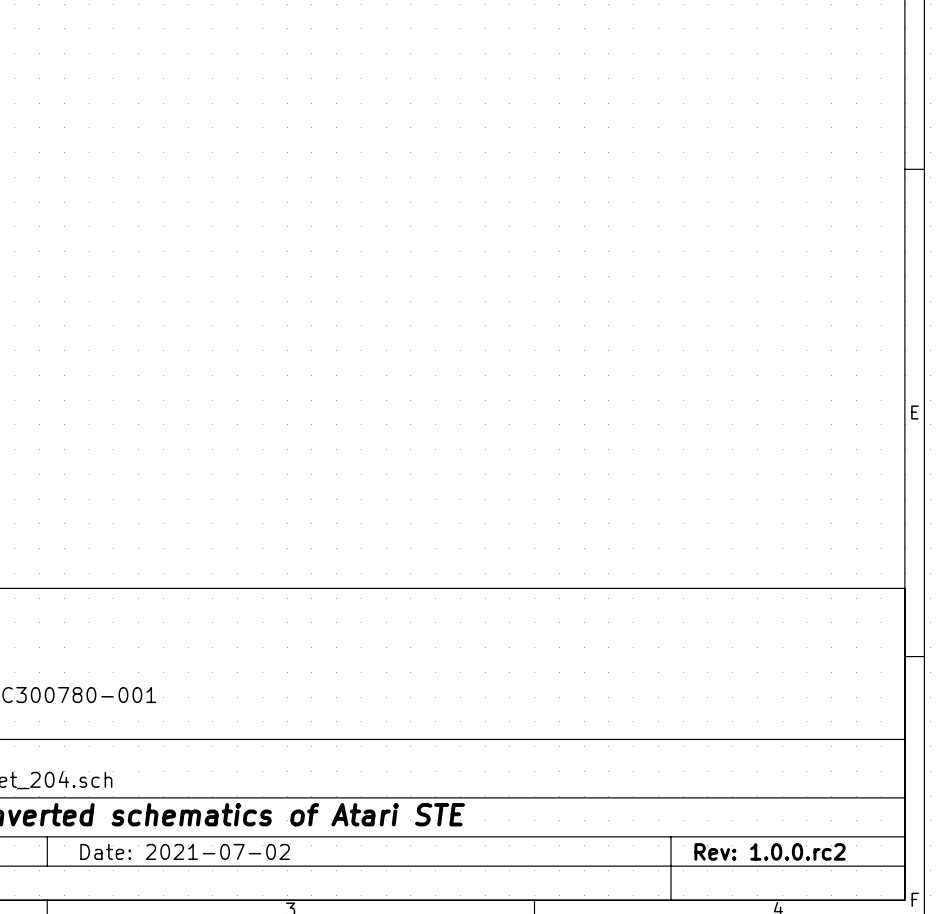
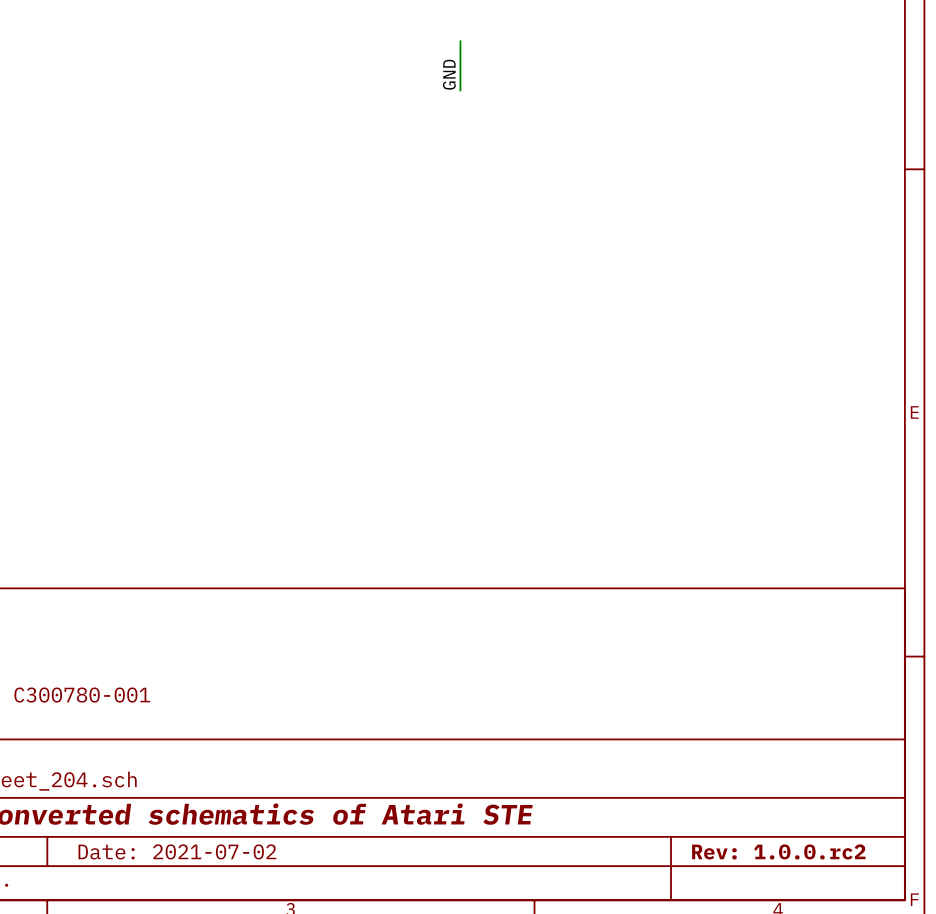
wire: none -> (460, 41) (460, 90)
label: none -> GND (449, 74)

